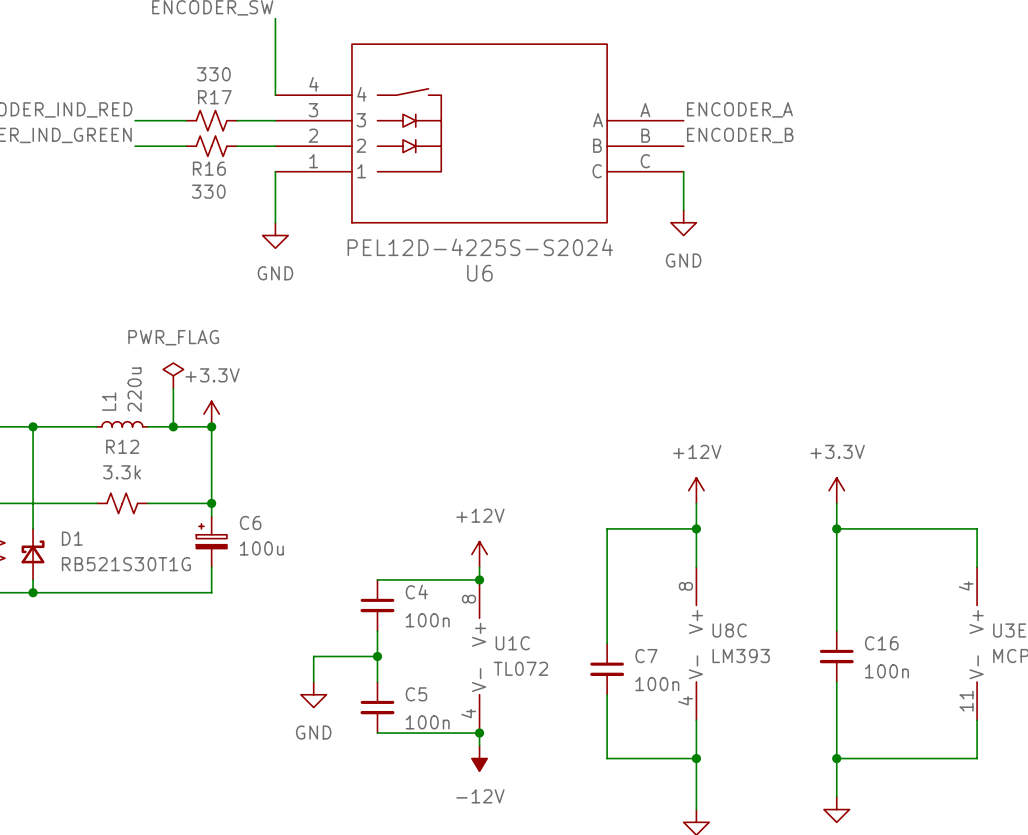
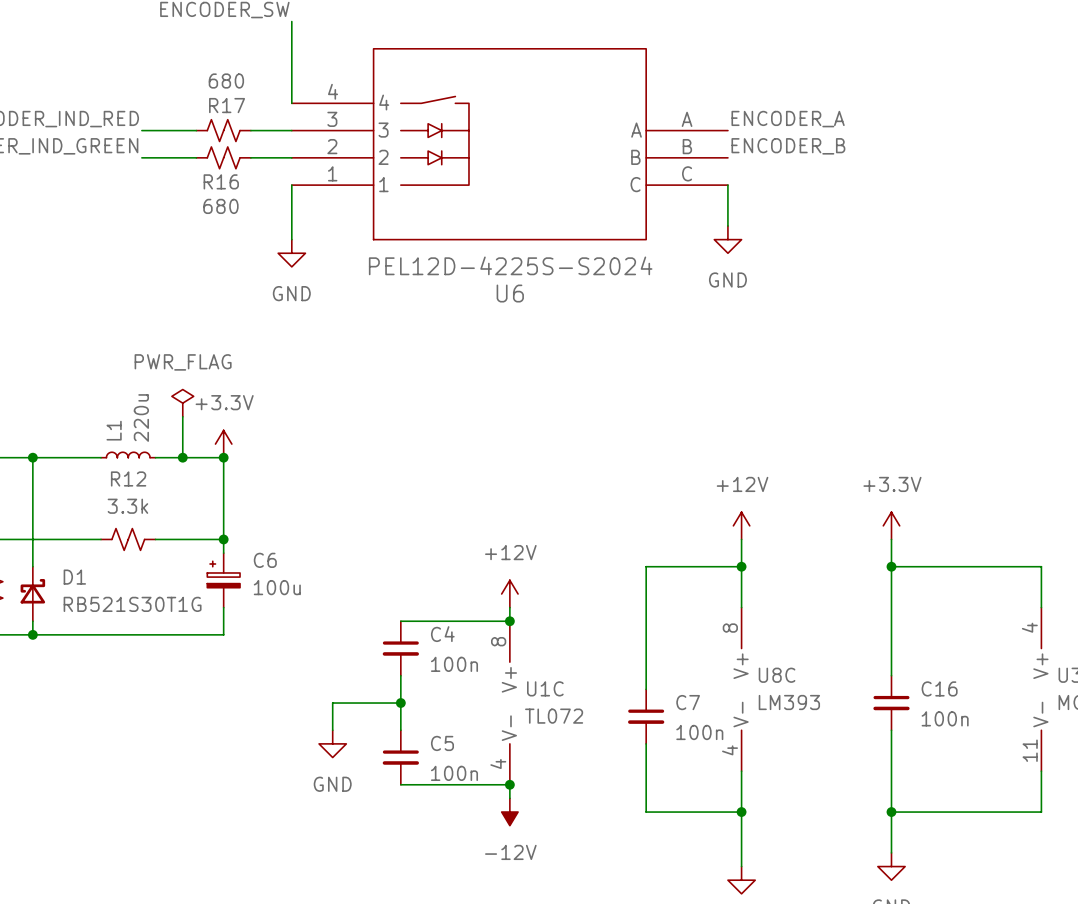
R17 value: 330 (213, 74) -> 680 (226, 81)
R16 value: 330 (208, 191) -> 680 (220, 206)

